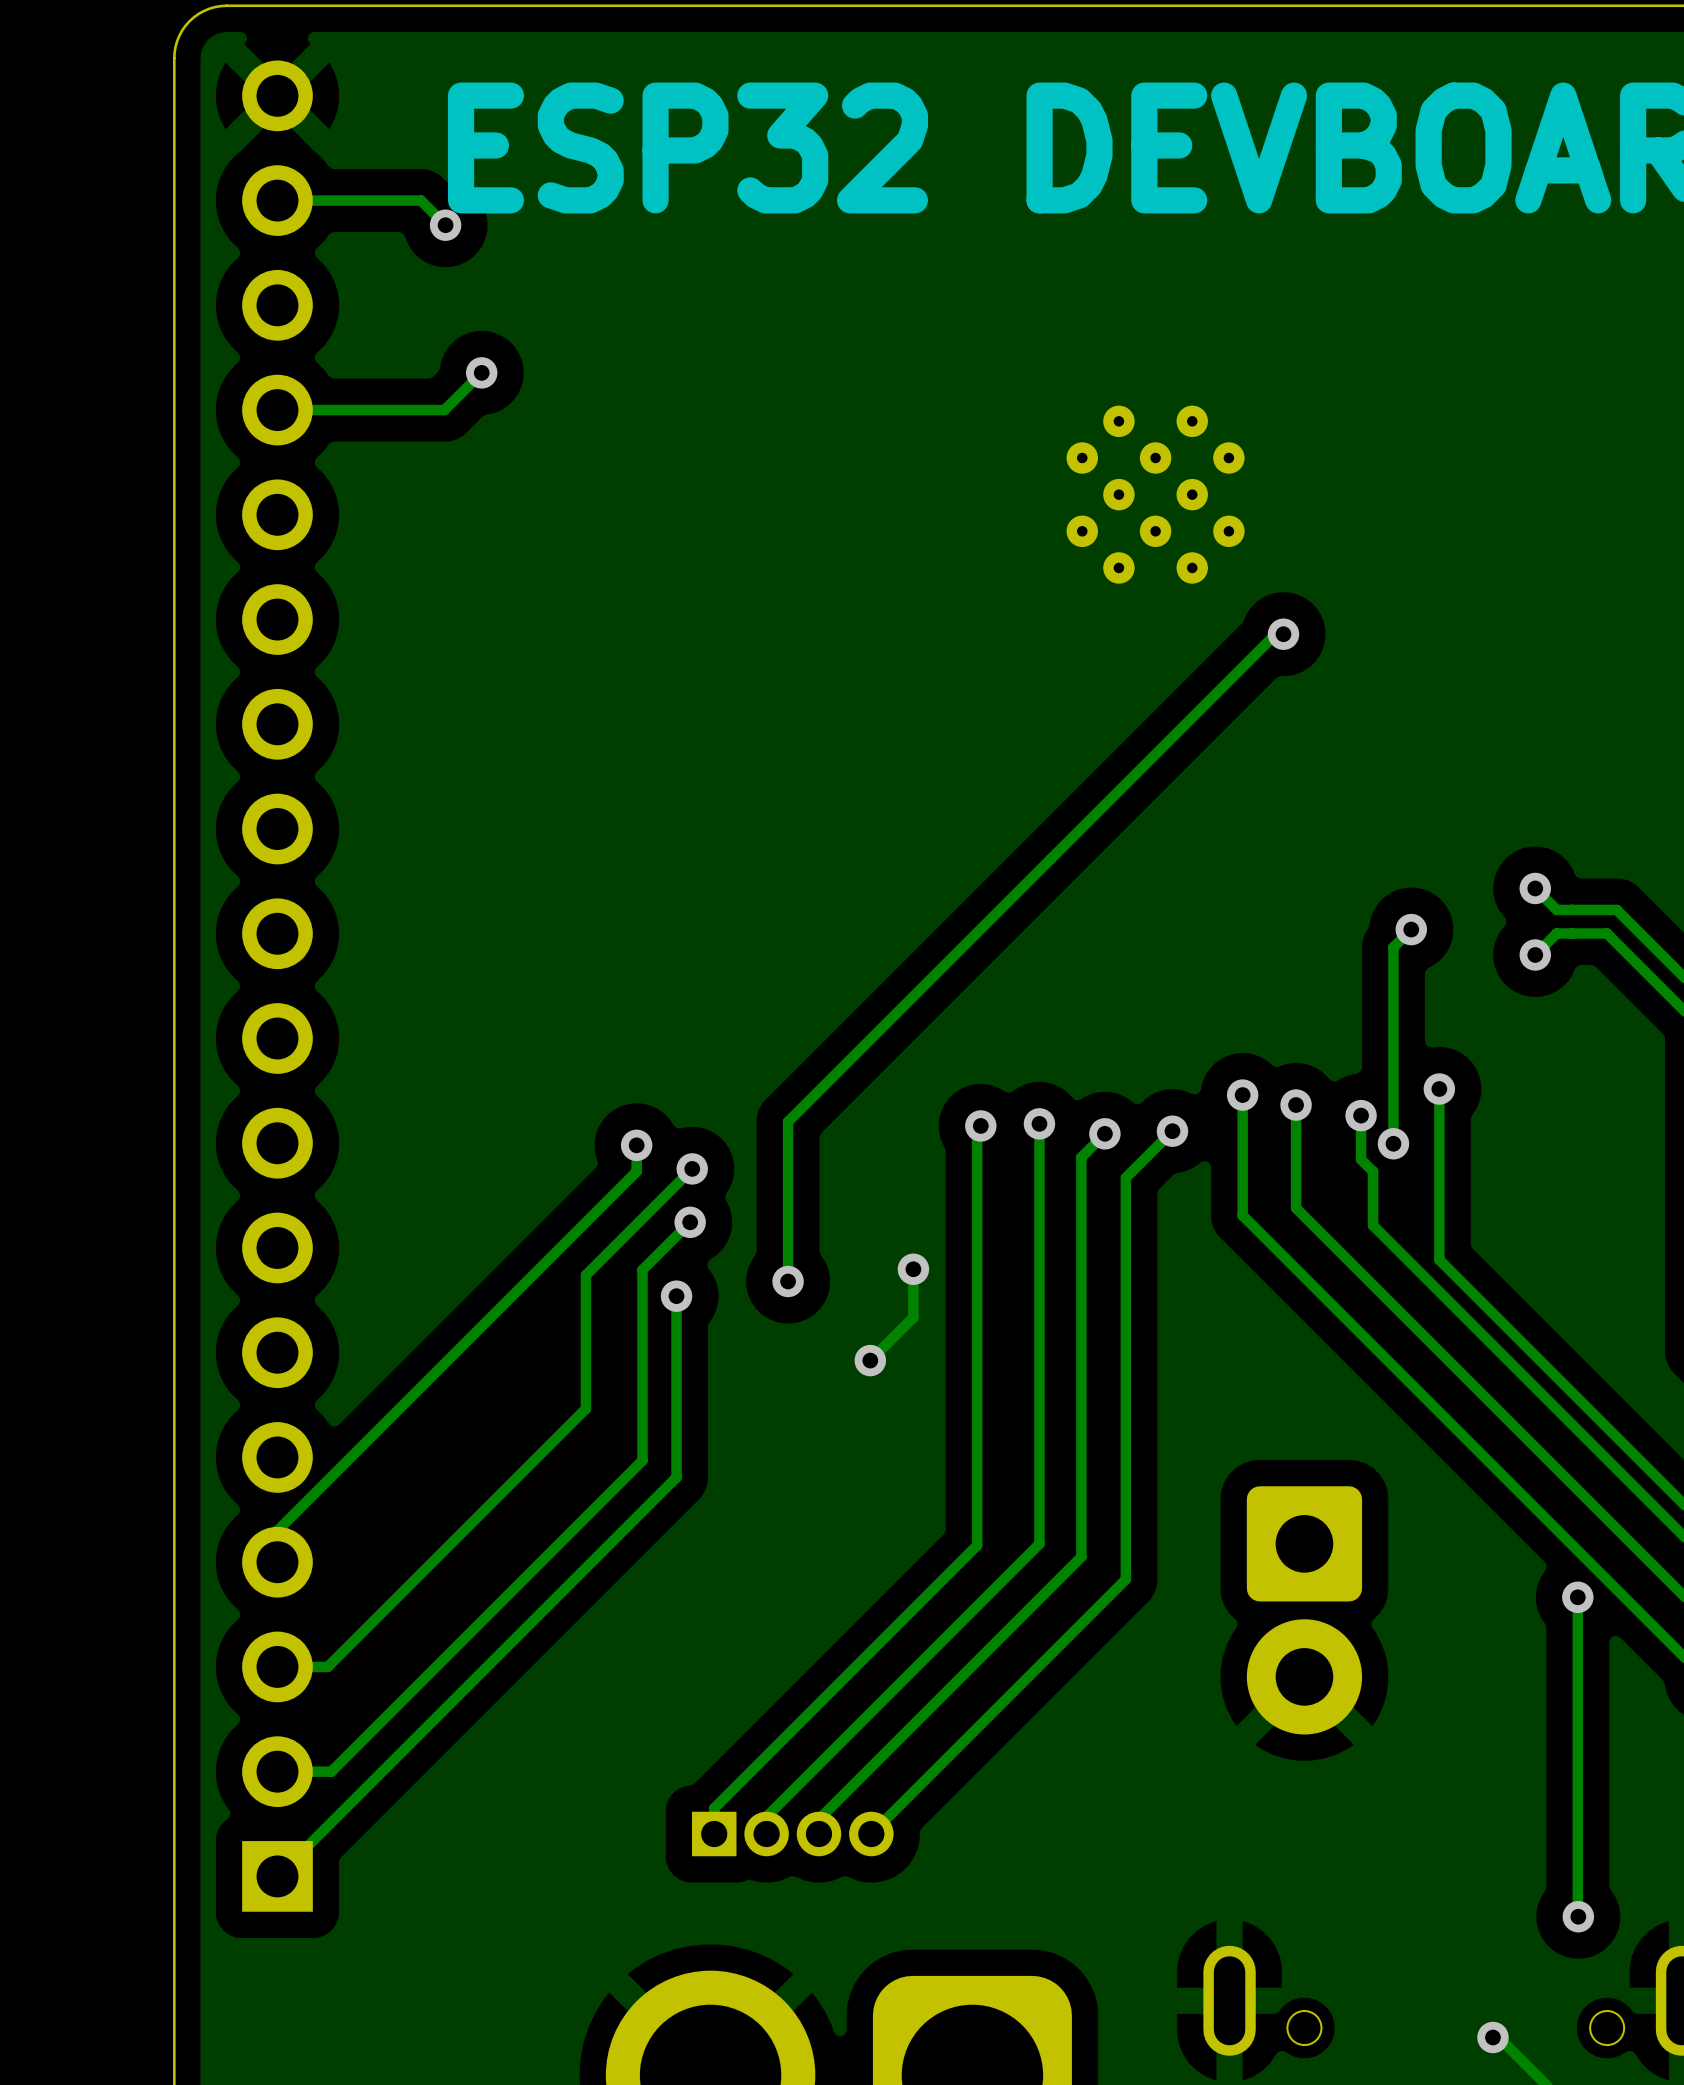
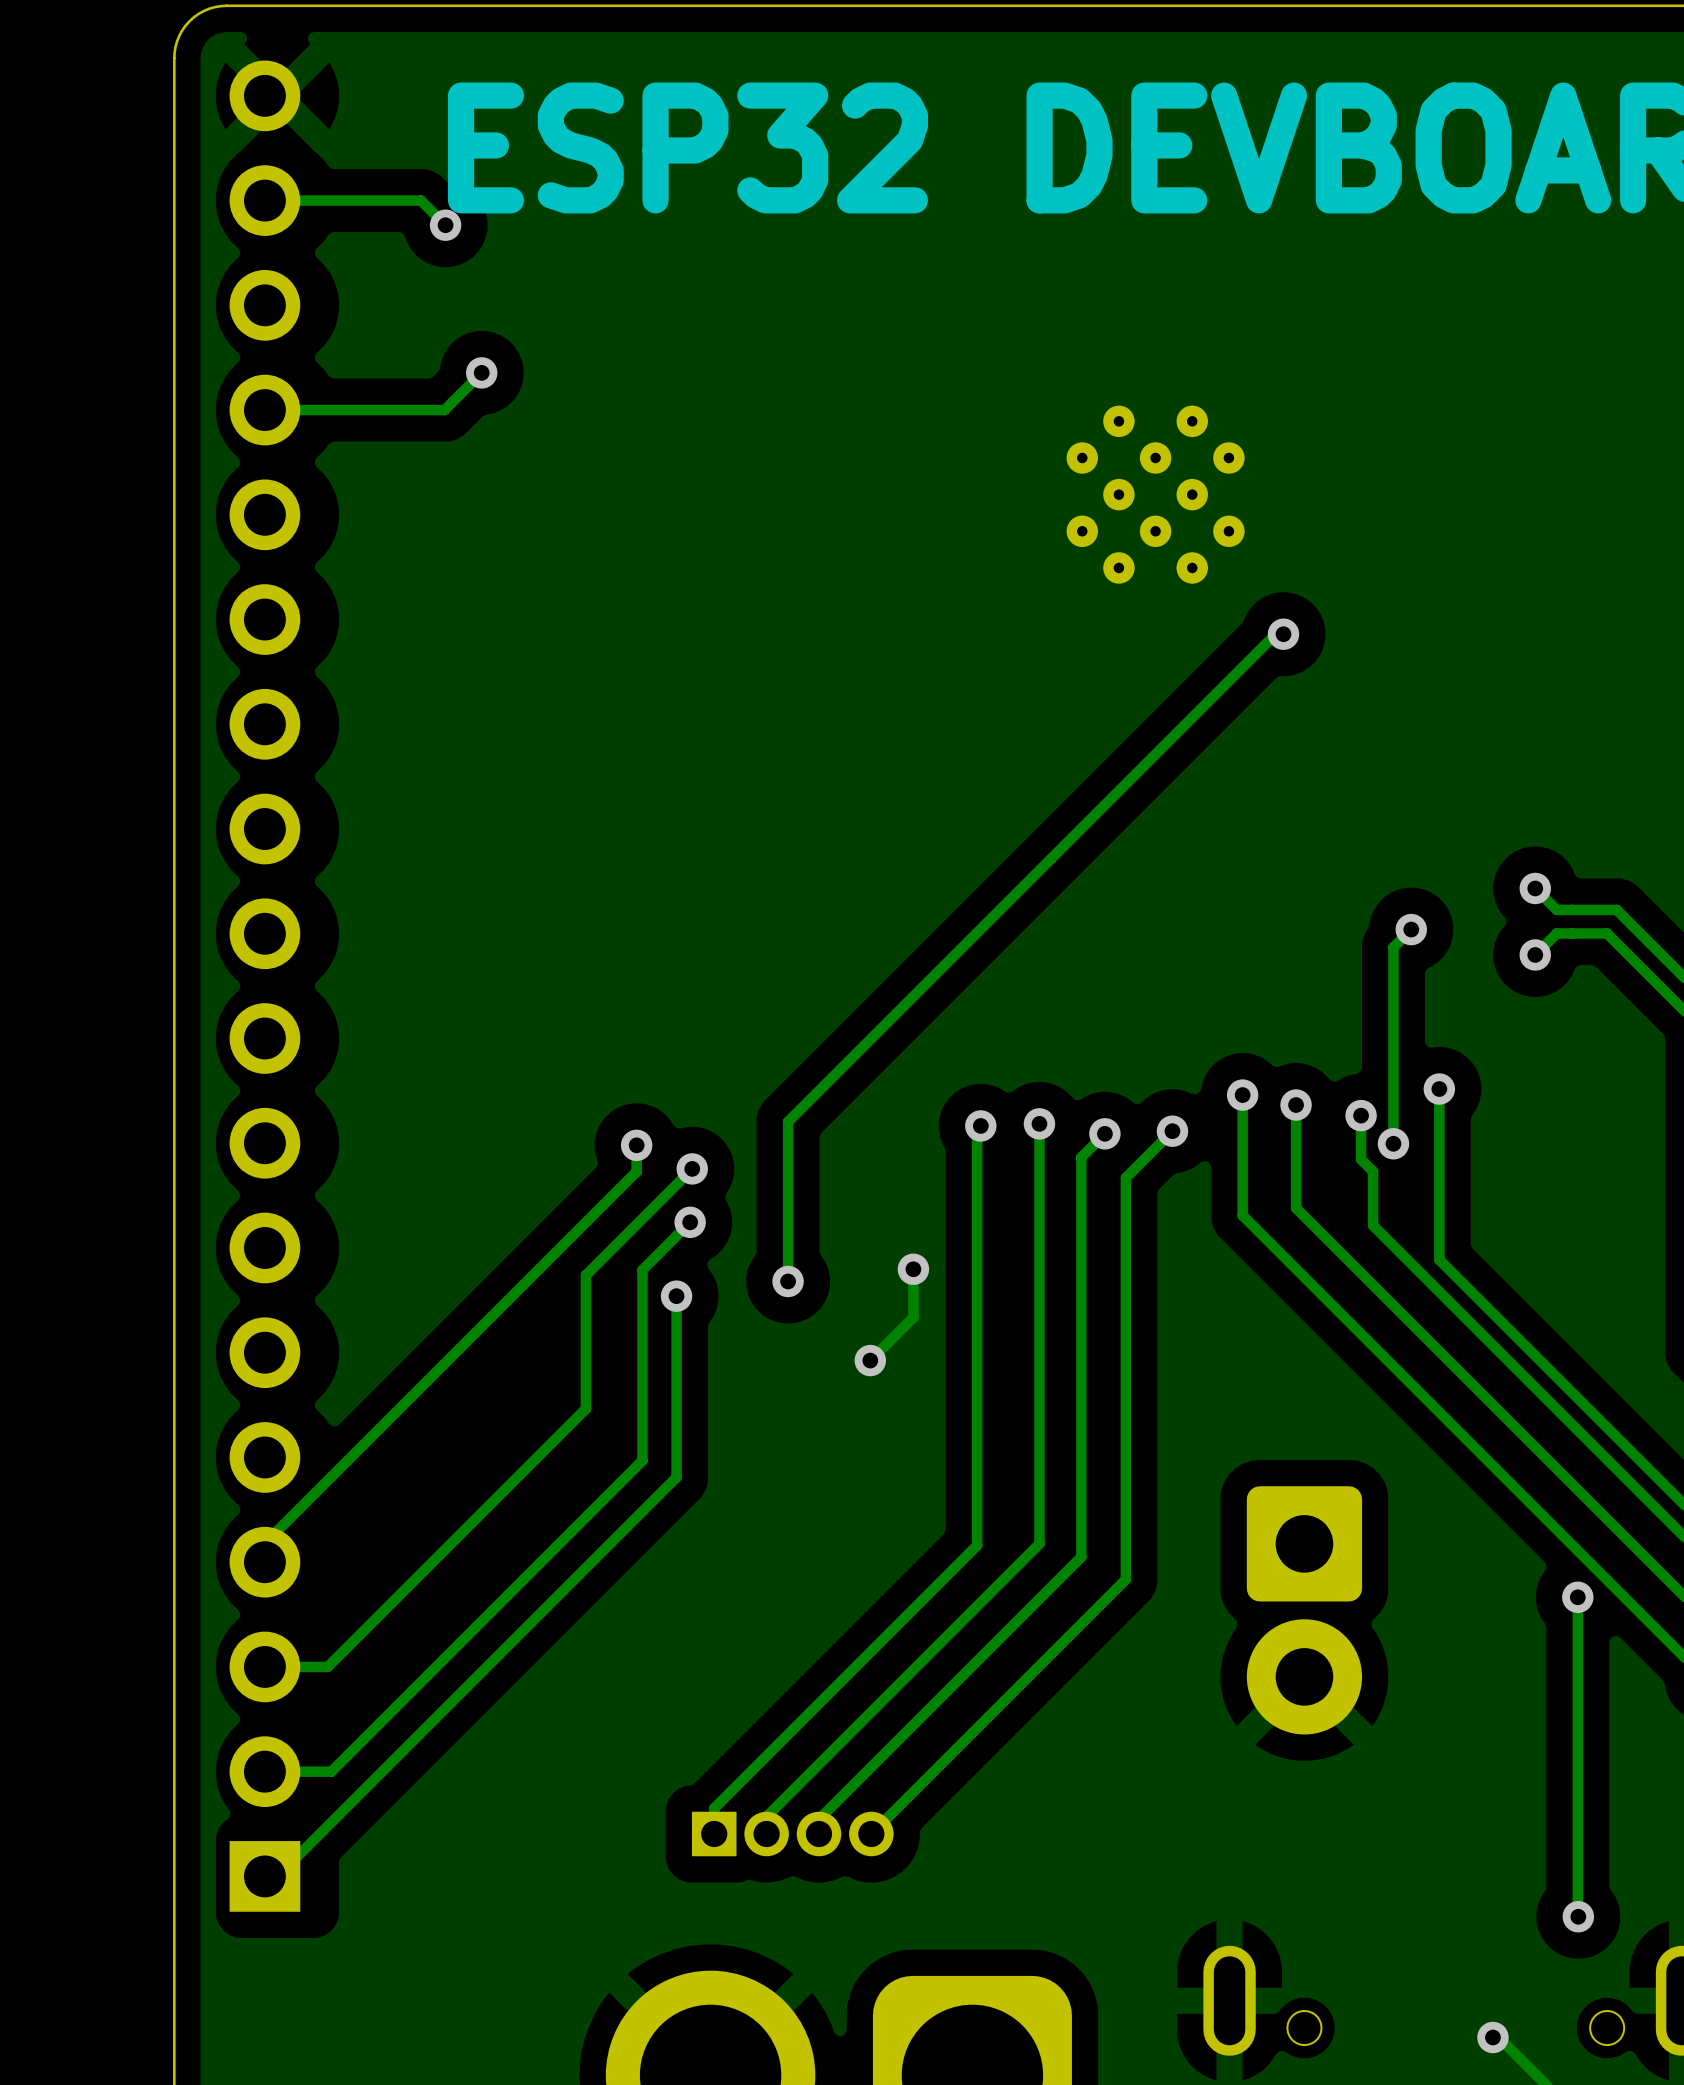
part position: (277, 986) -> (264, 986)

